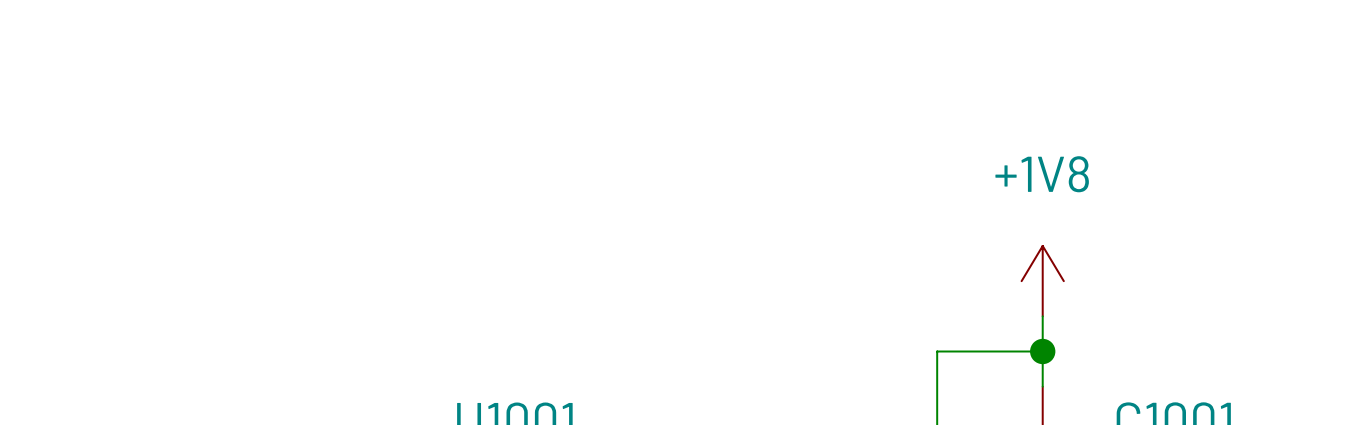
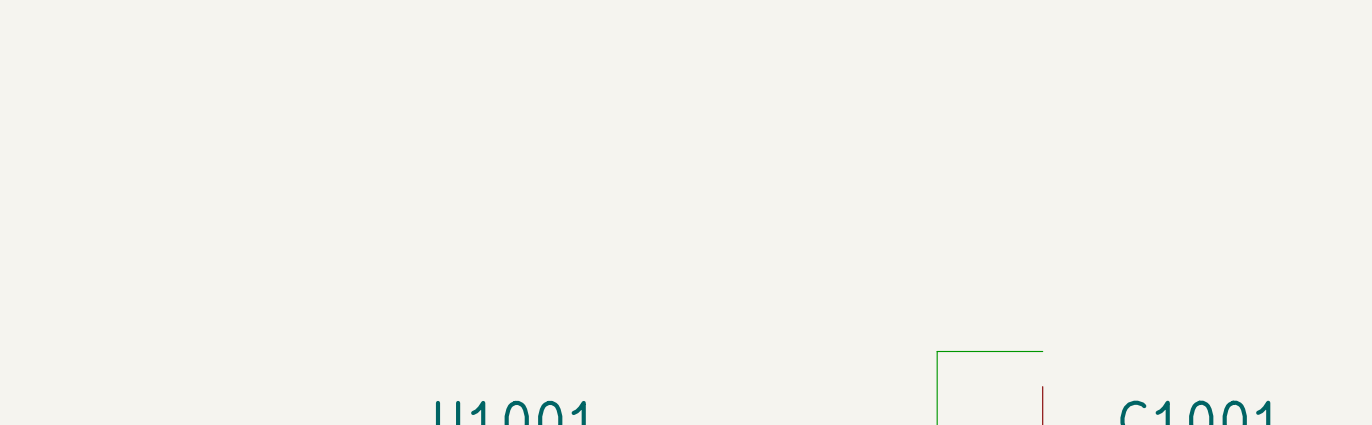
power symbol: +1V8 (1042, 281) -> none
wire: (1042, 316) (1042, 386) -> none
junction: (1042, 351) -> none

